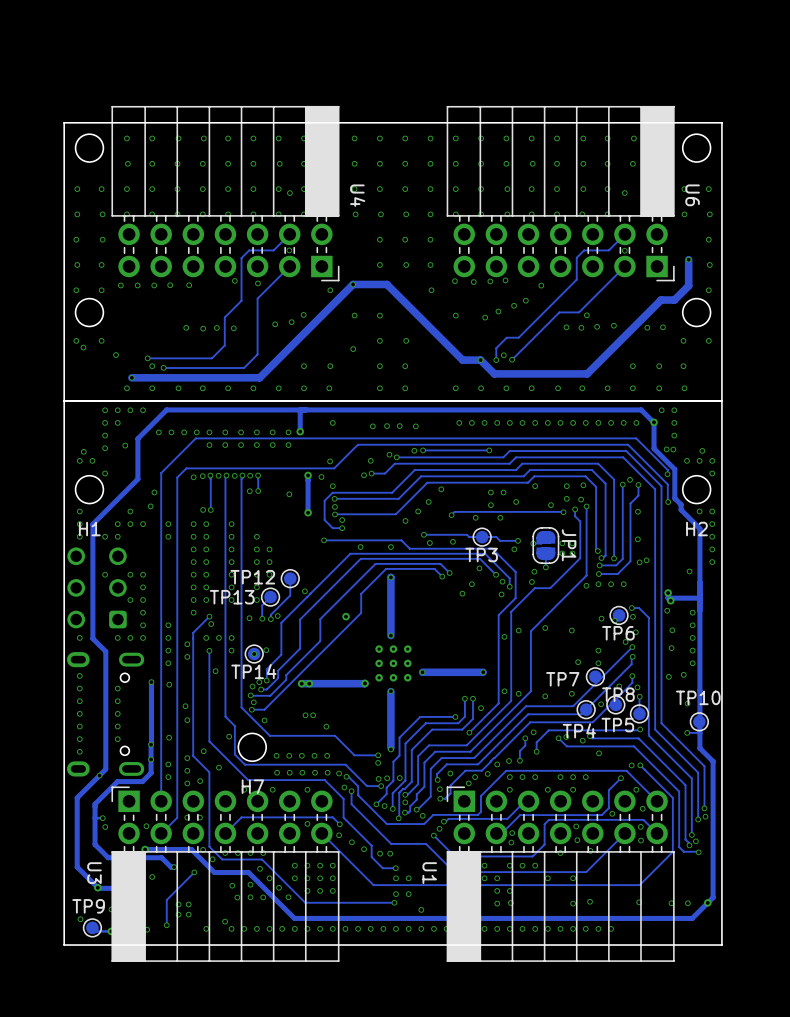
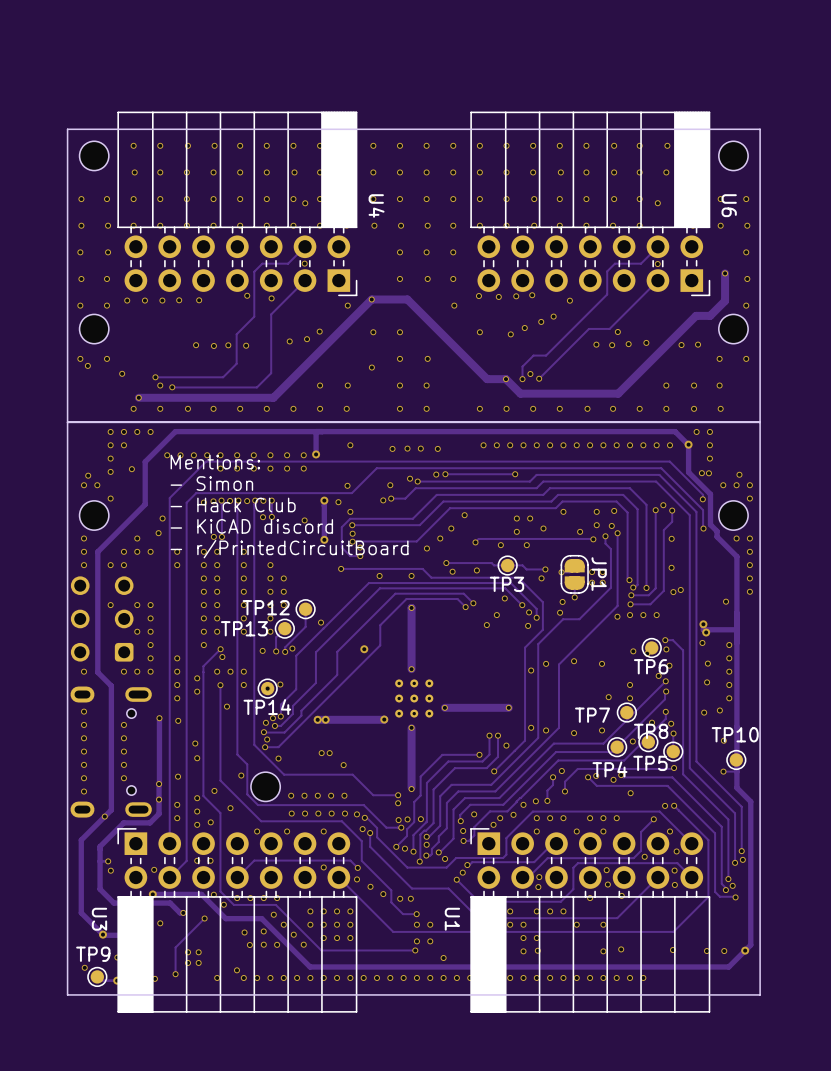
text: none -> Mentions: (215, 462)
text: none -> - Simon (211, 483)
text: none -> - Hack Club (233, 504)
text: none -> - KiCAD discord (251, 526)
text: none -> - r/PrintedCircuitBoard (289, 549)
H1 name: H1 (89, 529) -> none
H2 name: H2 (696, 529) -> none
H7 name: H7 (252, 786) -> none

